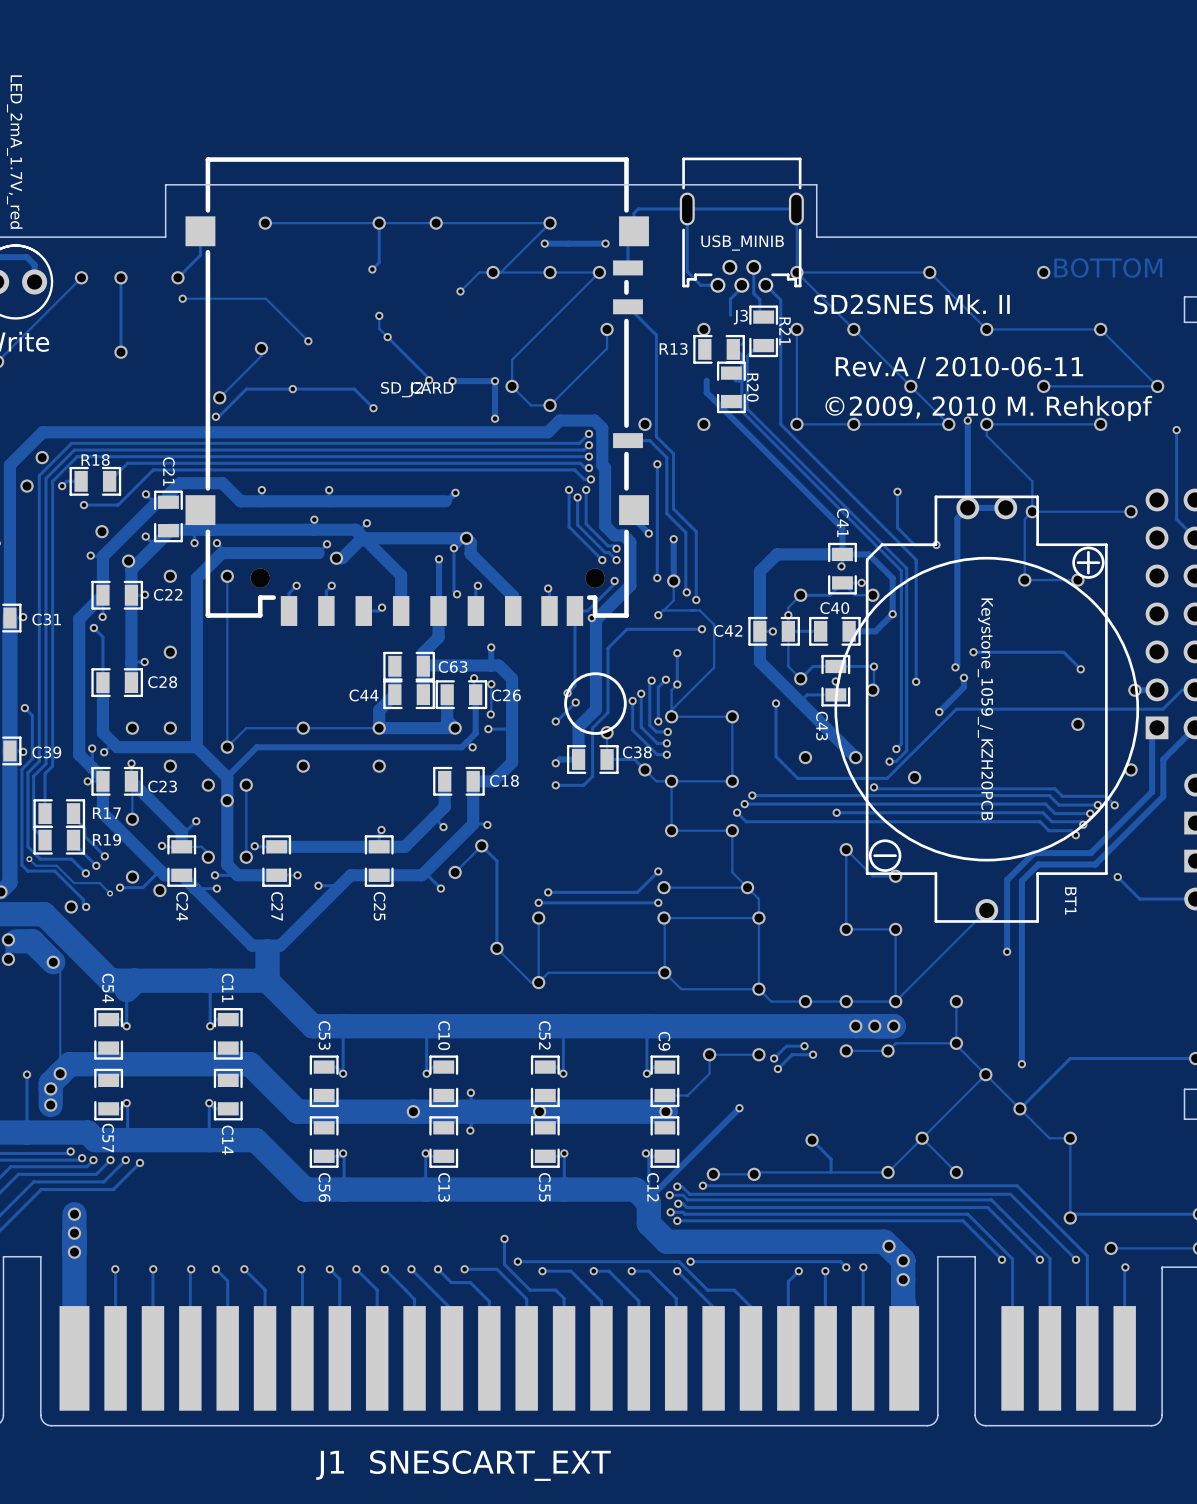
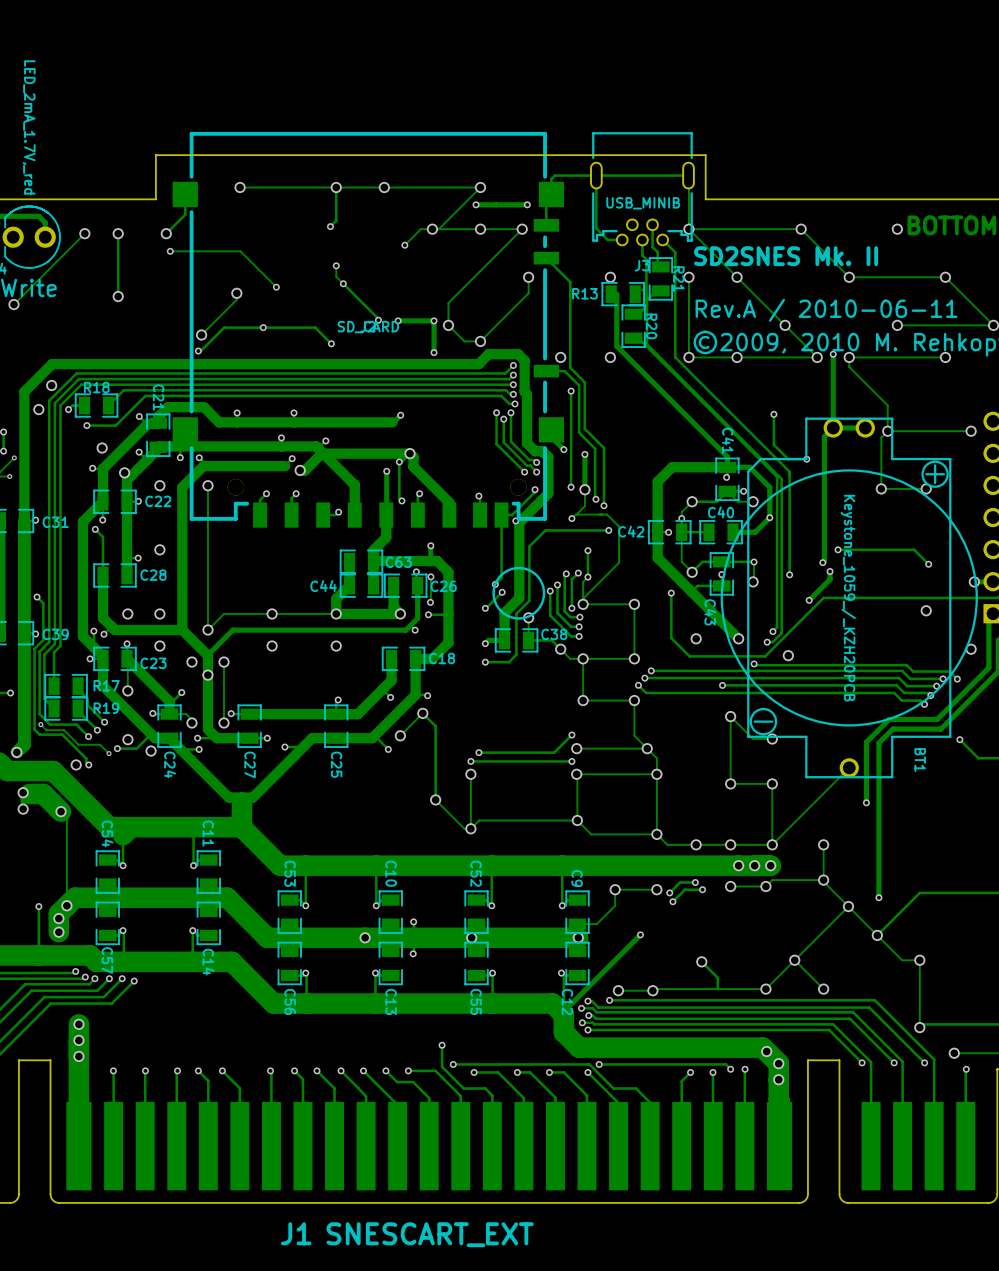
track: (741, 287) (730, 299) (730, 315) -> (642, 242) (642, 255) (646, 259) (646, 306) (638, 314)
track: (730, 343) (741, 355) (741, 411) (901, 570) -> (638, 338) (777, 476) (777, 480)
track: (706, 380) (706, 392) (842, 528) (842, 542) -> (616, 294) (616, 346) (727, 456)
track: (741, 380) (735, 380) (741, 381) -> none

